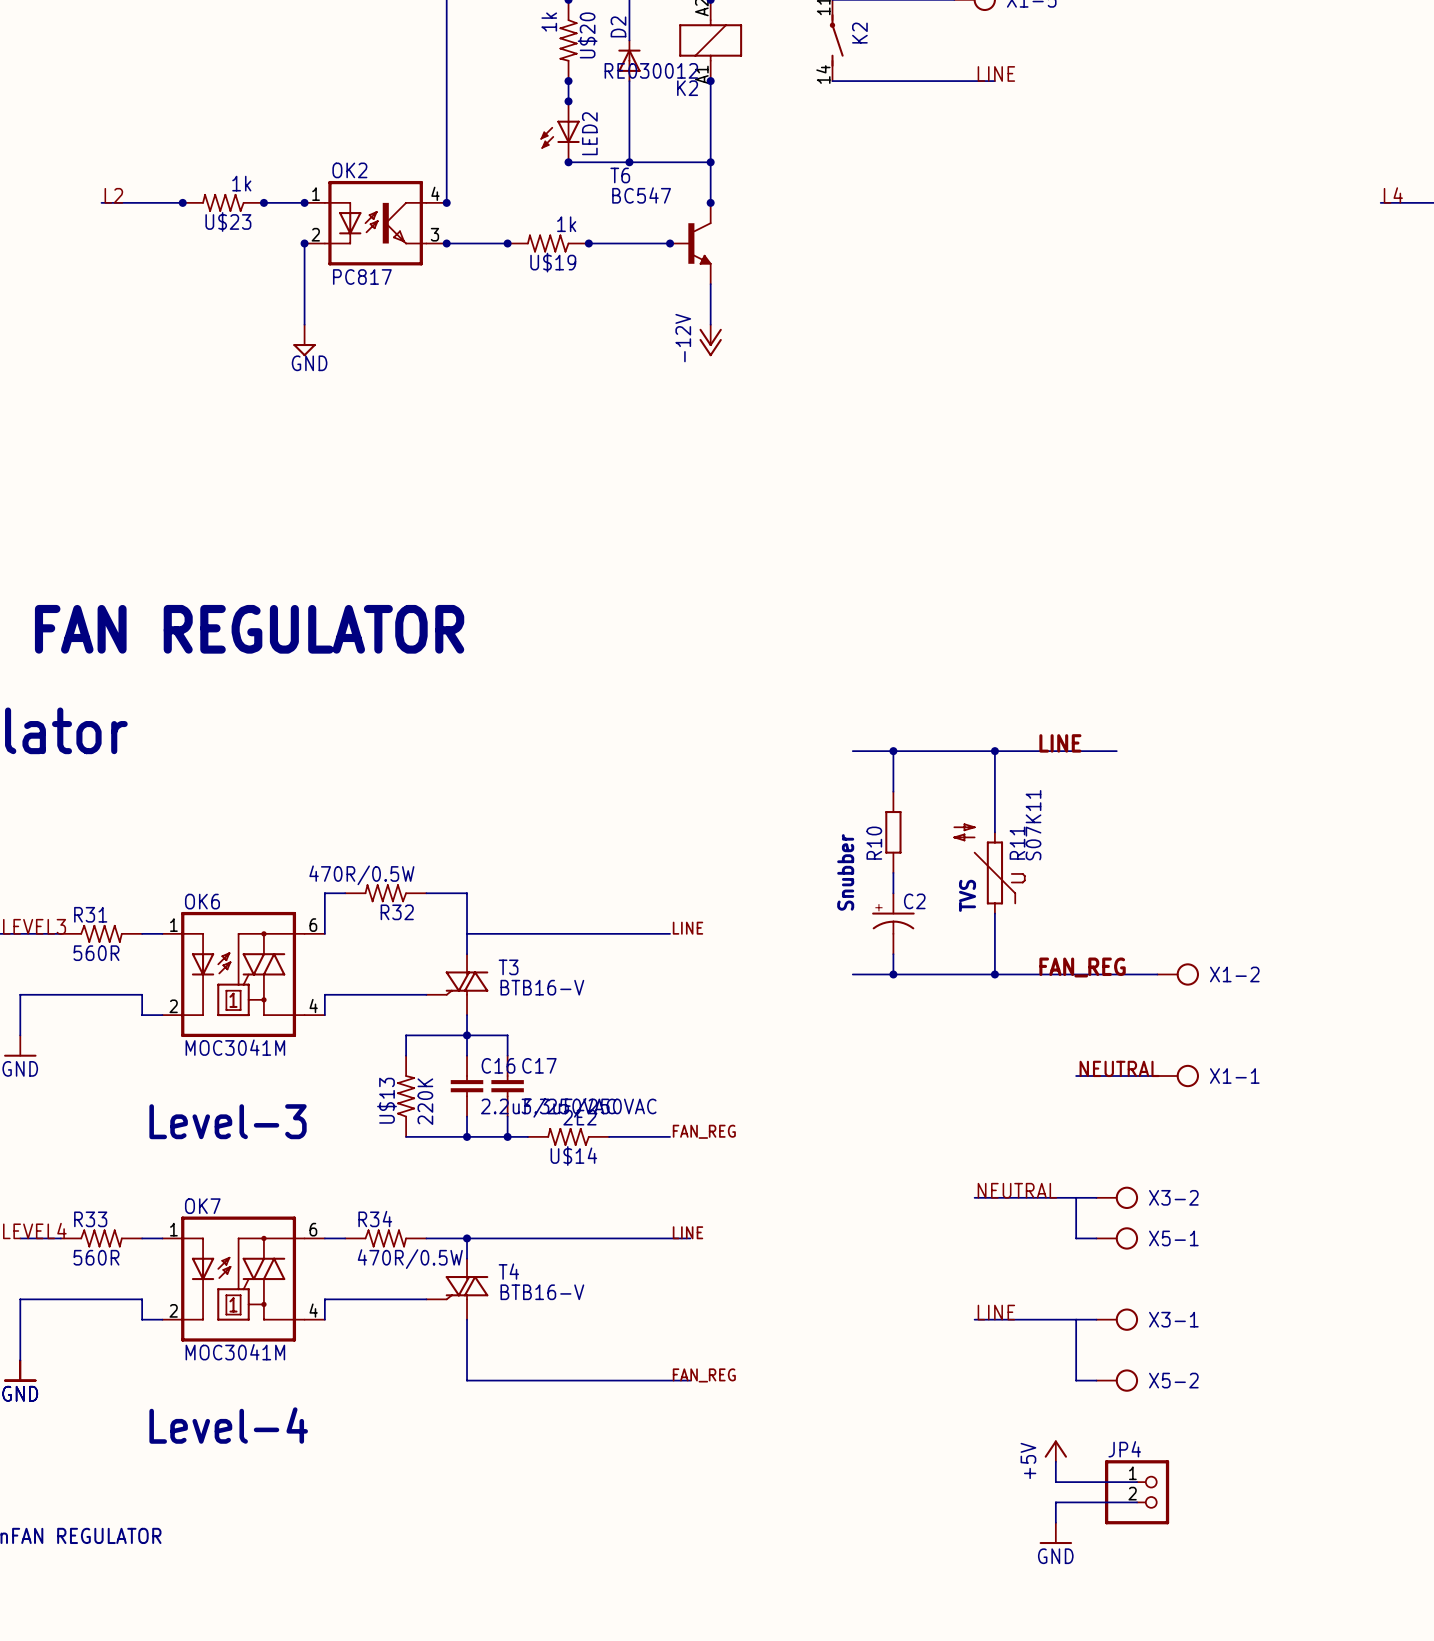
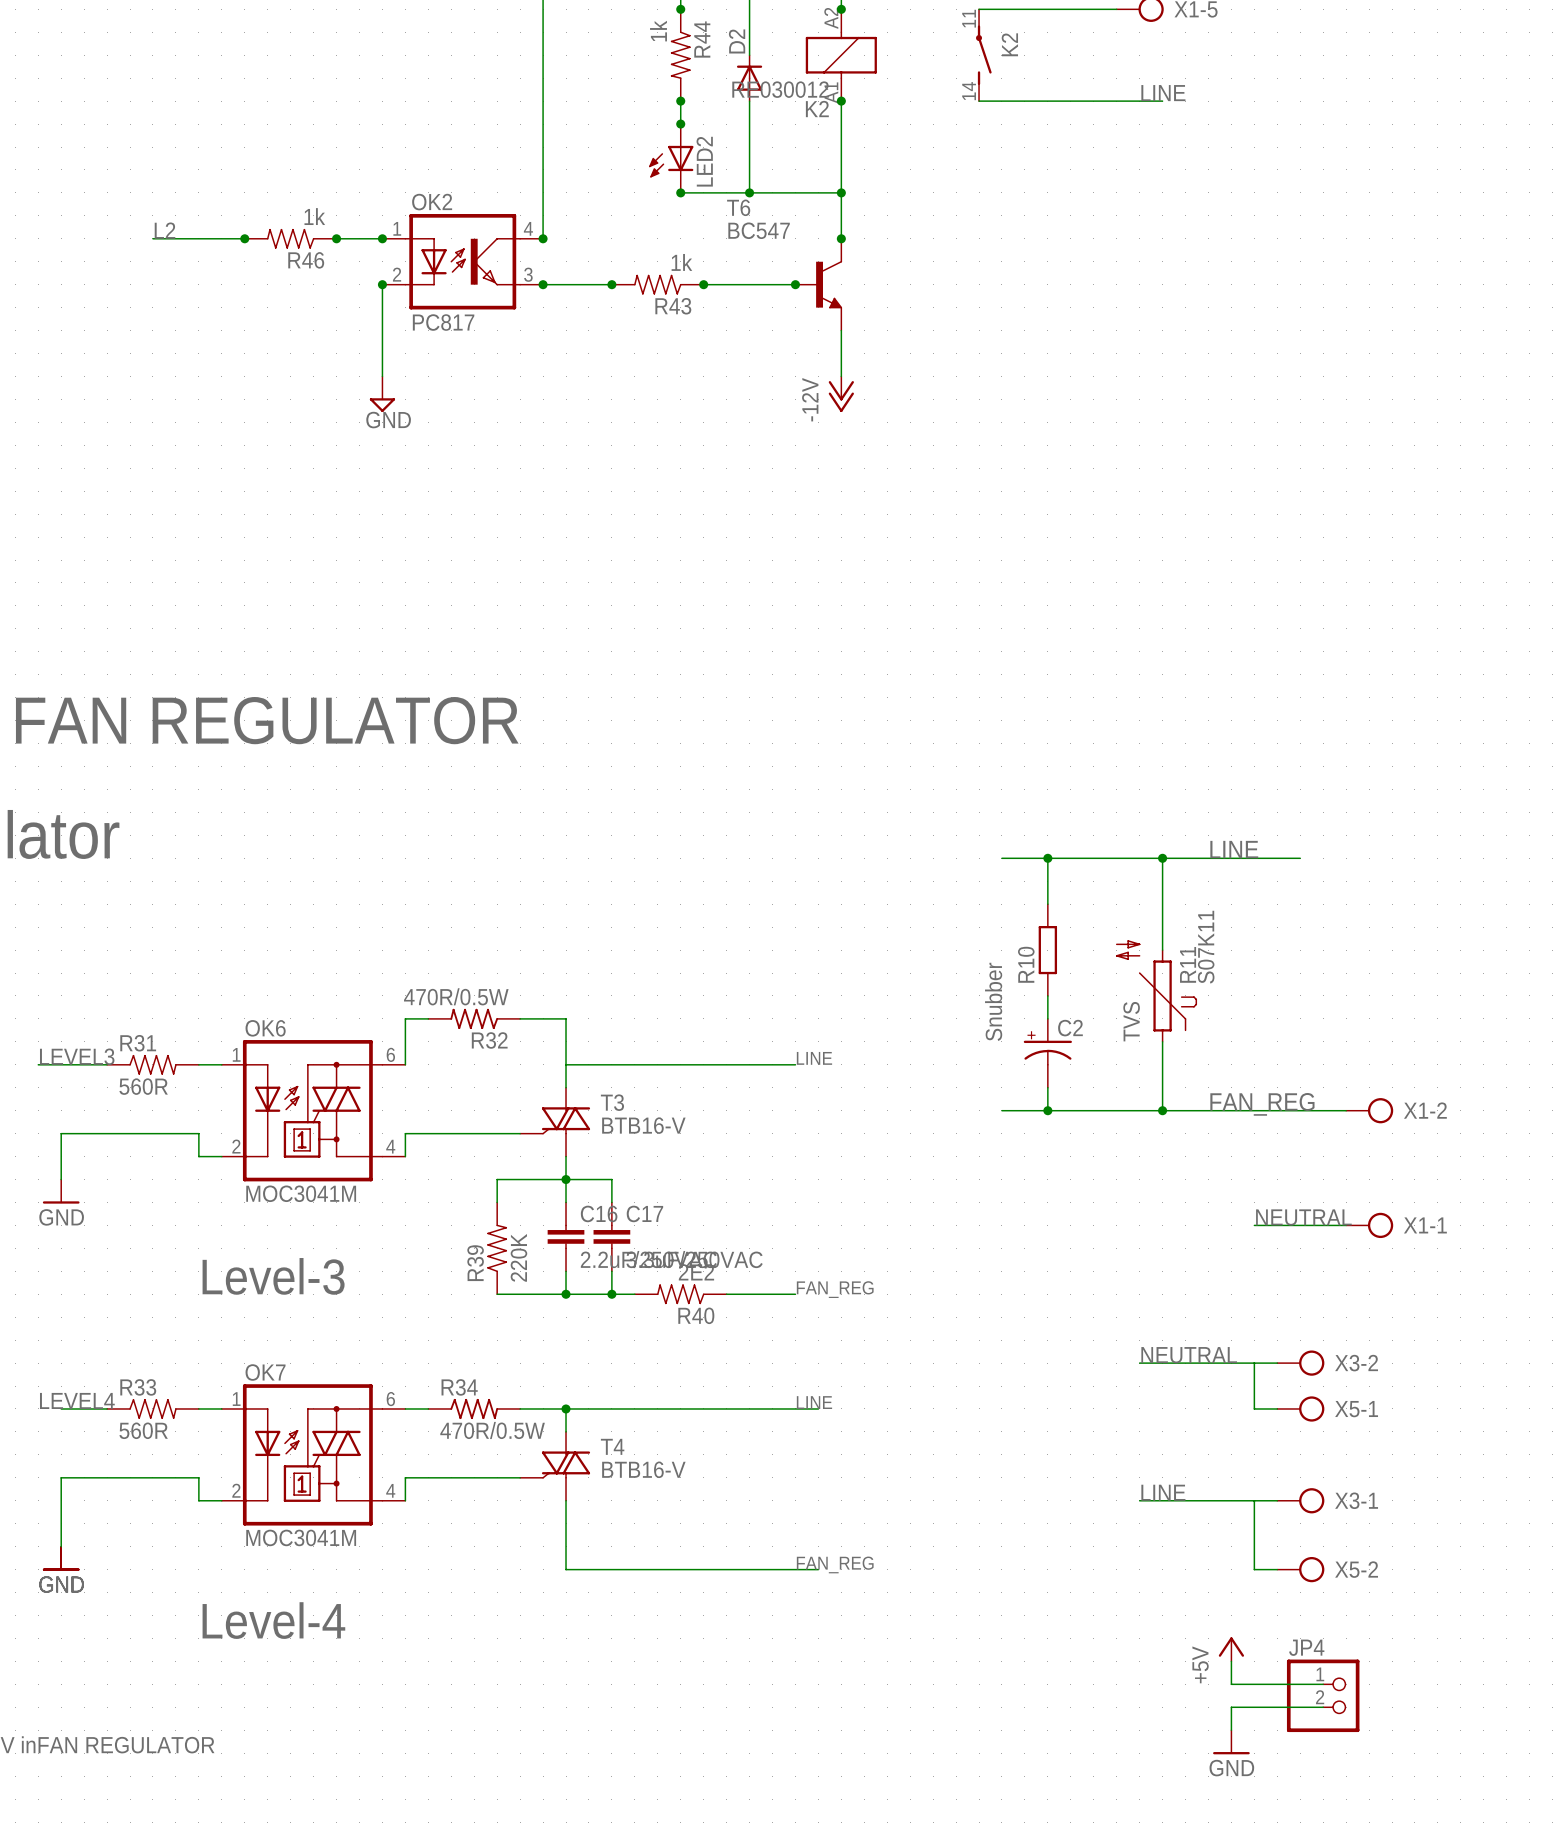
U$20 name: U$20 (587, 35) -> R44 (702, 39)
U$23 name: U$23 (228, 221) -> R46 (306, 260)
U$19 name: U$19 (553, 262) -> R43 (673, 306)
U$13 name: U$13 (387, 1100) -> R39 (475, 1263)
U$14 name: U$14 (573, 1156) -> R40 (696, 1315)

